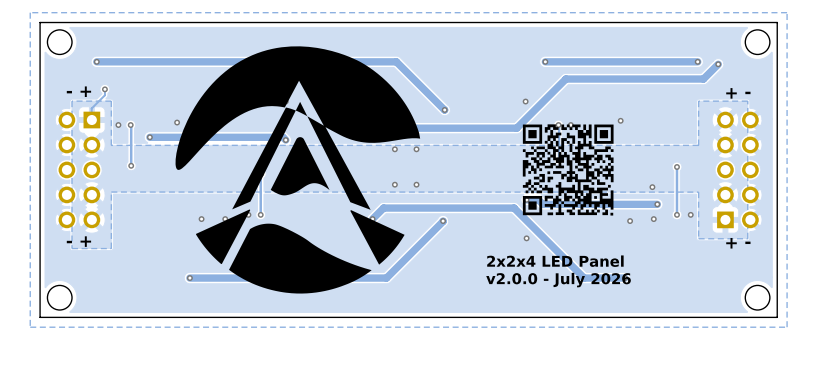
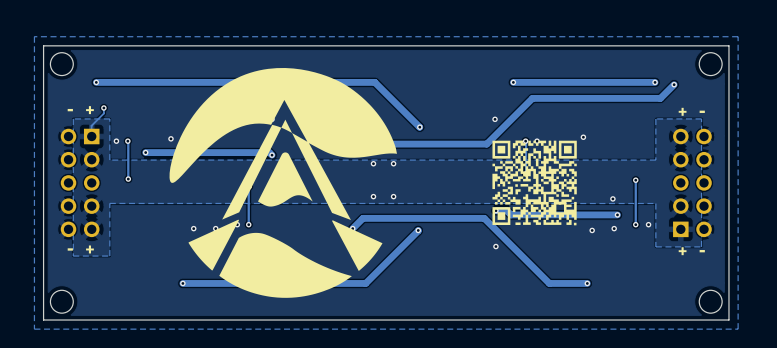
drawing: [594, 196, 600, 213] -> none
text: 2x2x4 LED Panel (555, 261) -> none
text: v2.0.0 - July 2026 (558, 280) -> none

